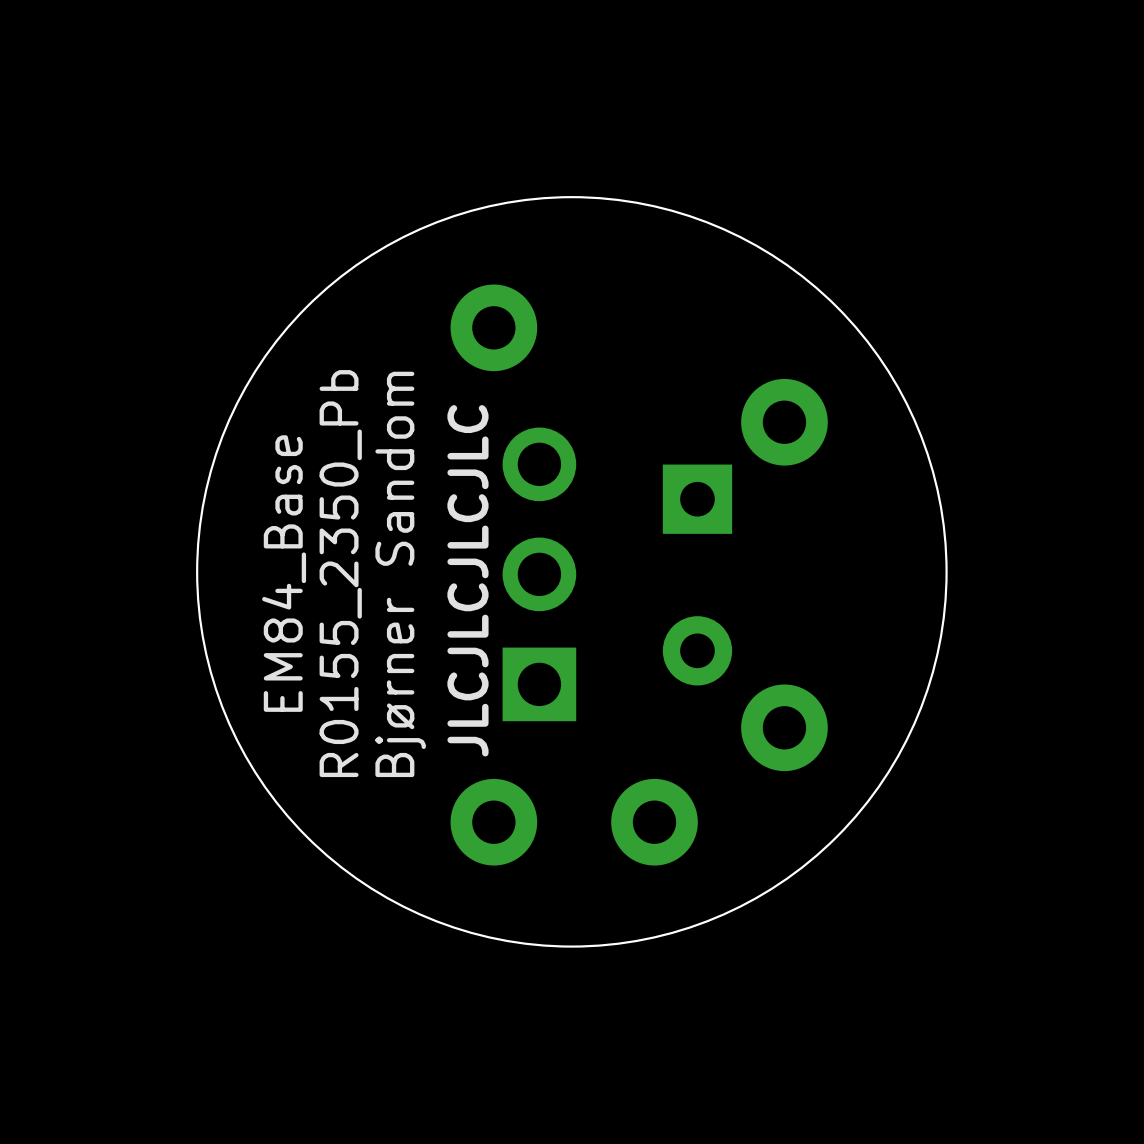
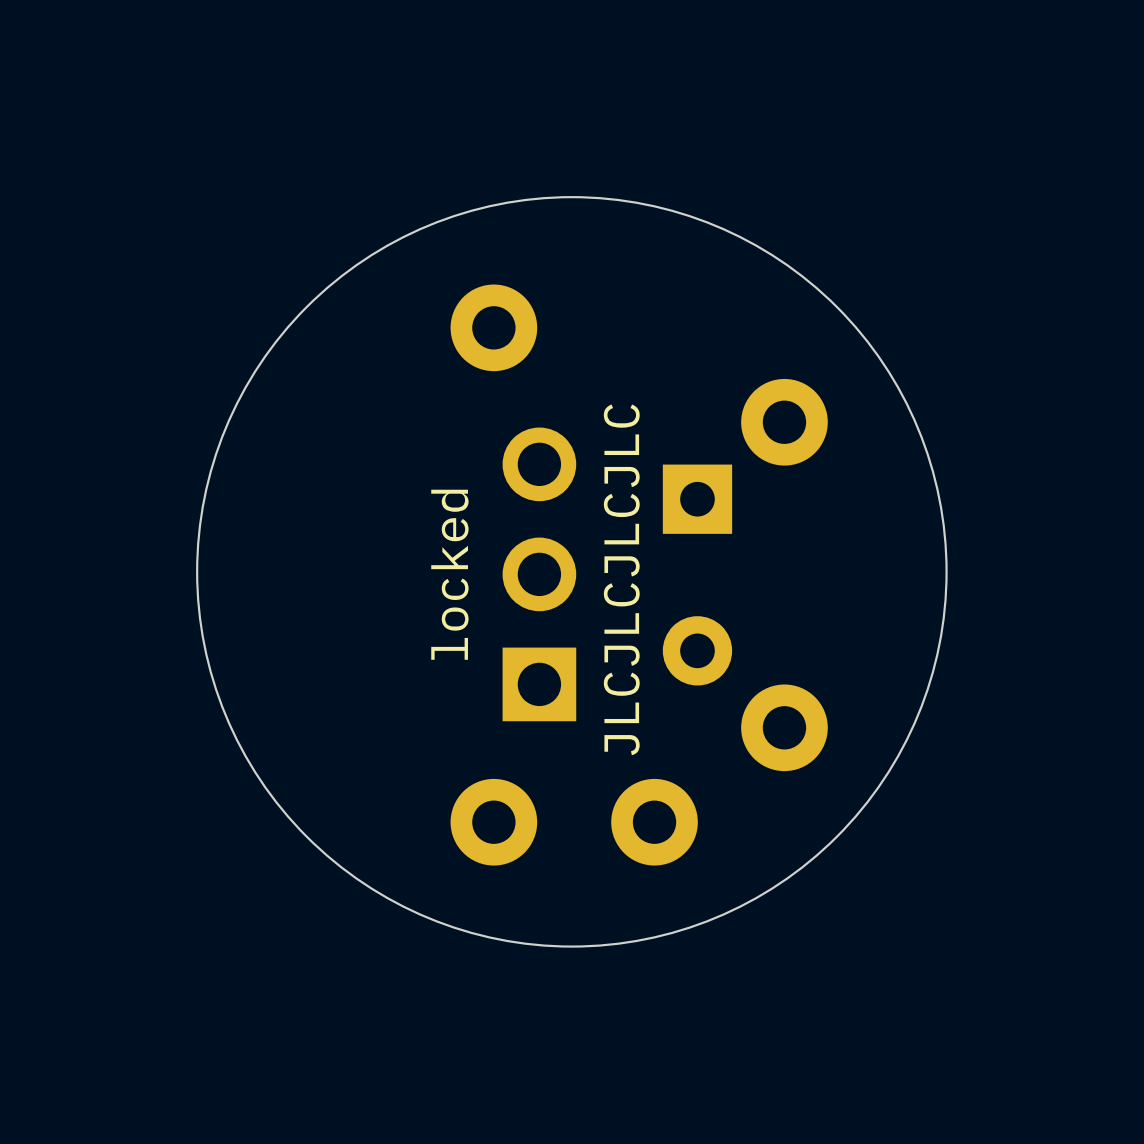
text: EM84_Base (284, 573) -> none
text: R0155_2350_Pb (340, 573) -> none
text: Bjørner Sandom (400, 574) -> none
text: none -> locked (449, 574)
text position: JLCJLCJLCJLC (467, 580) -> JLCJLCJLCJLC (621, 579)

